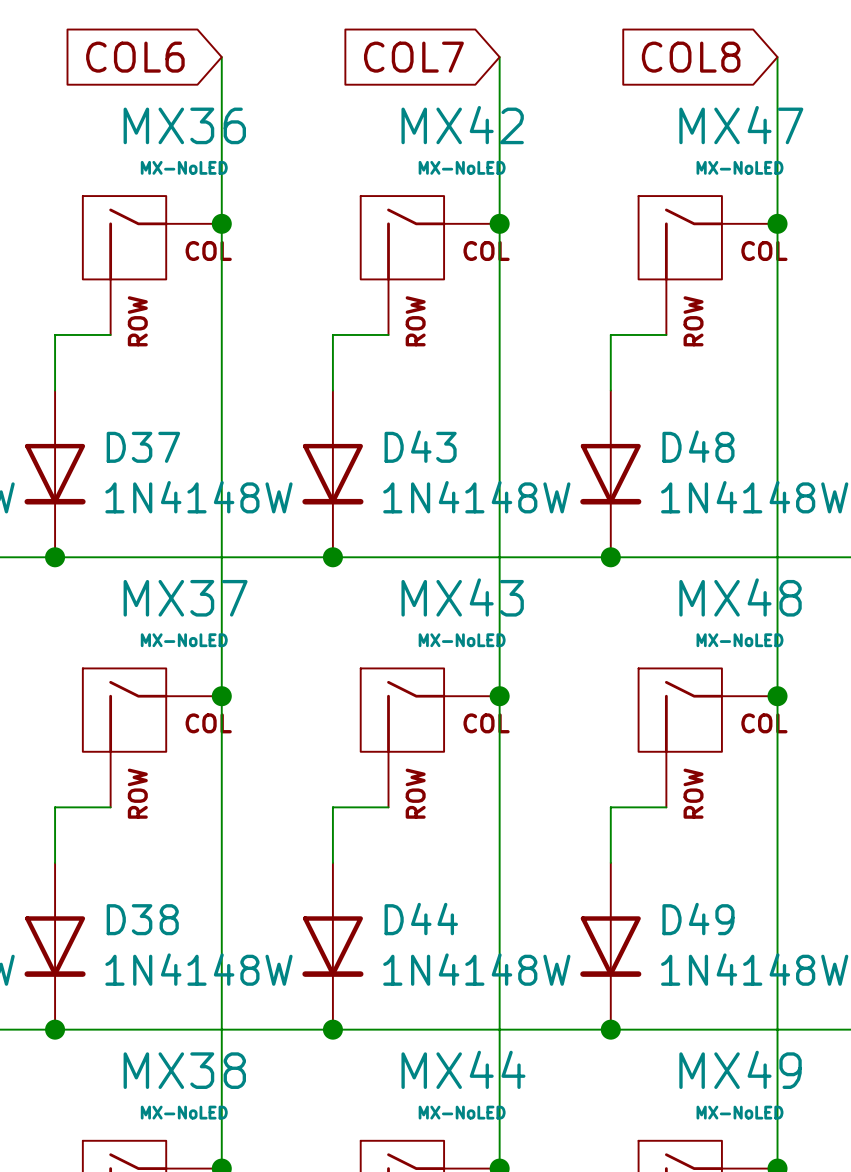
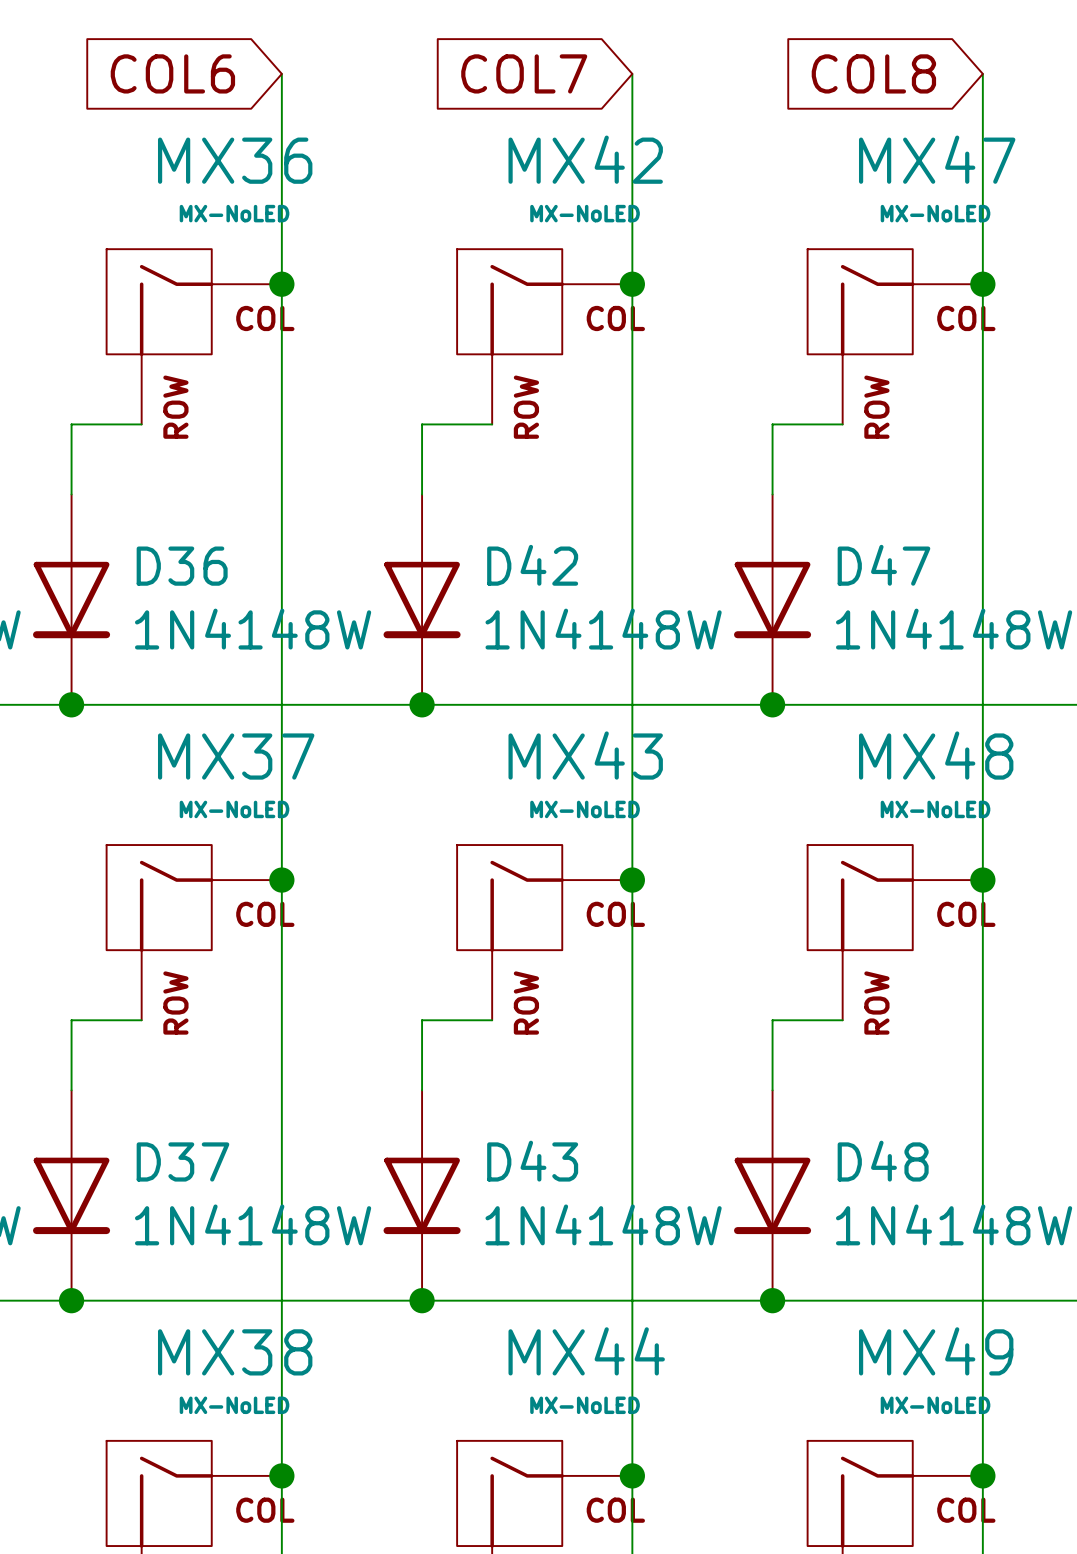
D43 name: D43 (420, 446) -> D42 (532, 565)
D48 name: D48 (698, 446) -> D47 (883, 565)
D37 name: D37 (143, 447) -> D36 (182, 566)
D38 name: D38 (142, 919) -> D37 (182, 1161)
D44 name: D44 (421, 919) -> D43 (532, 1161)
D49 name: D49 (698, 919) -> D48 (883, 1161)

